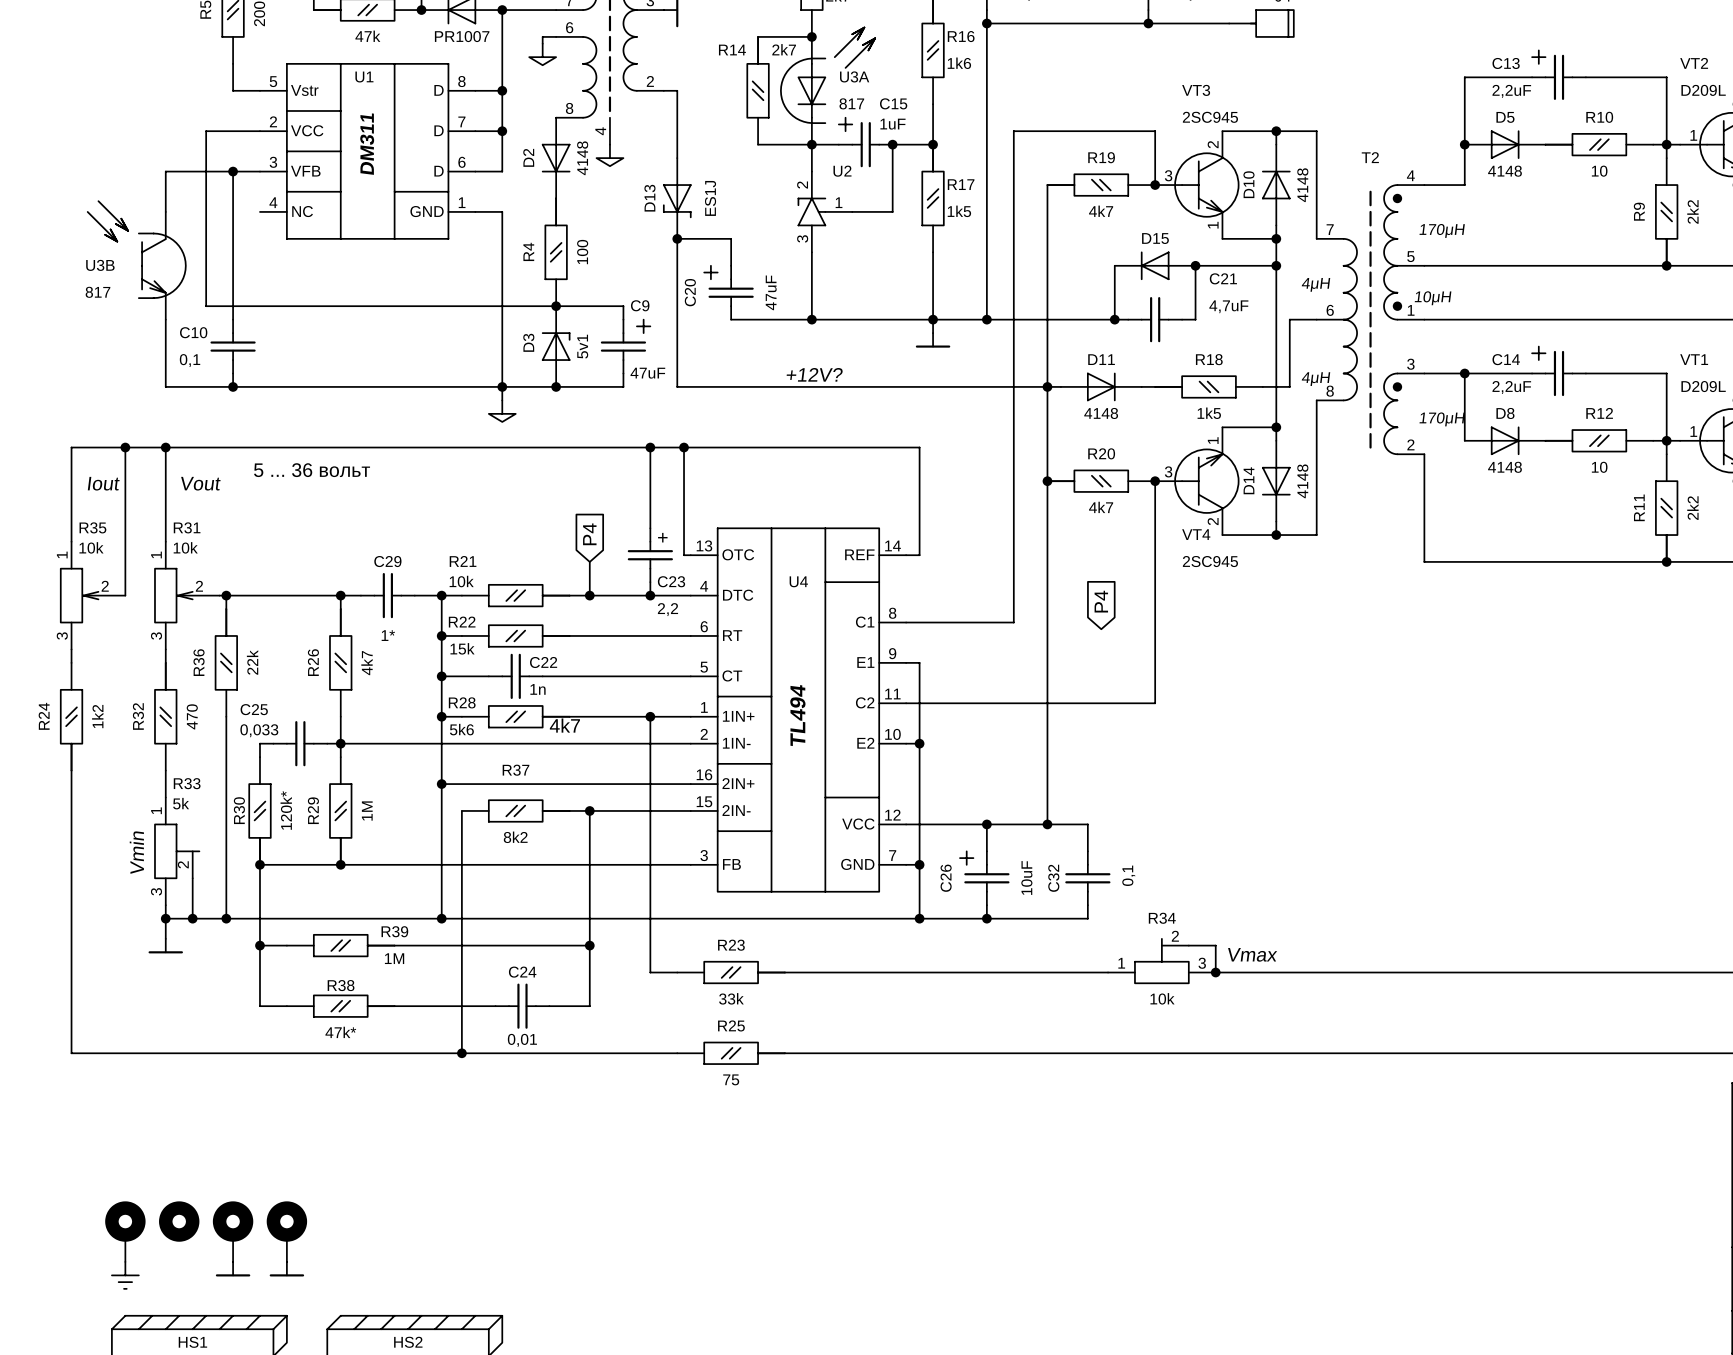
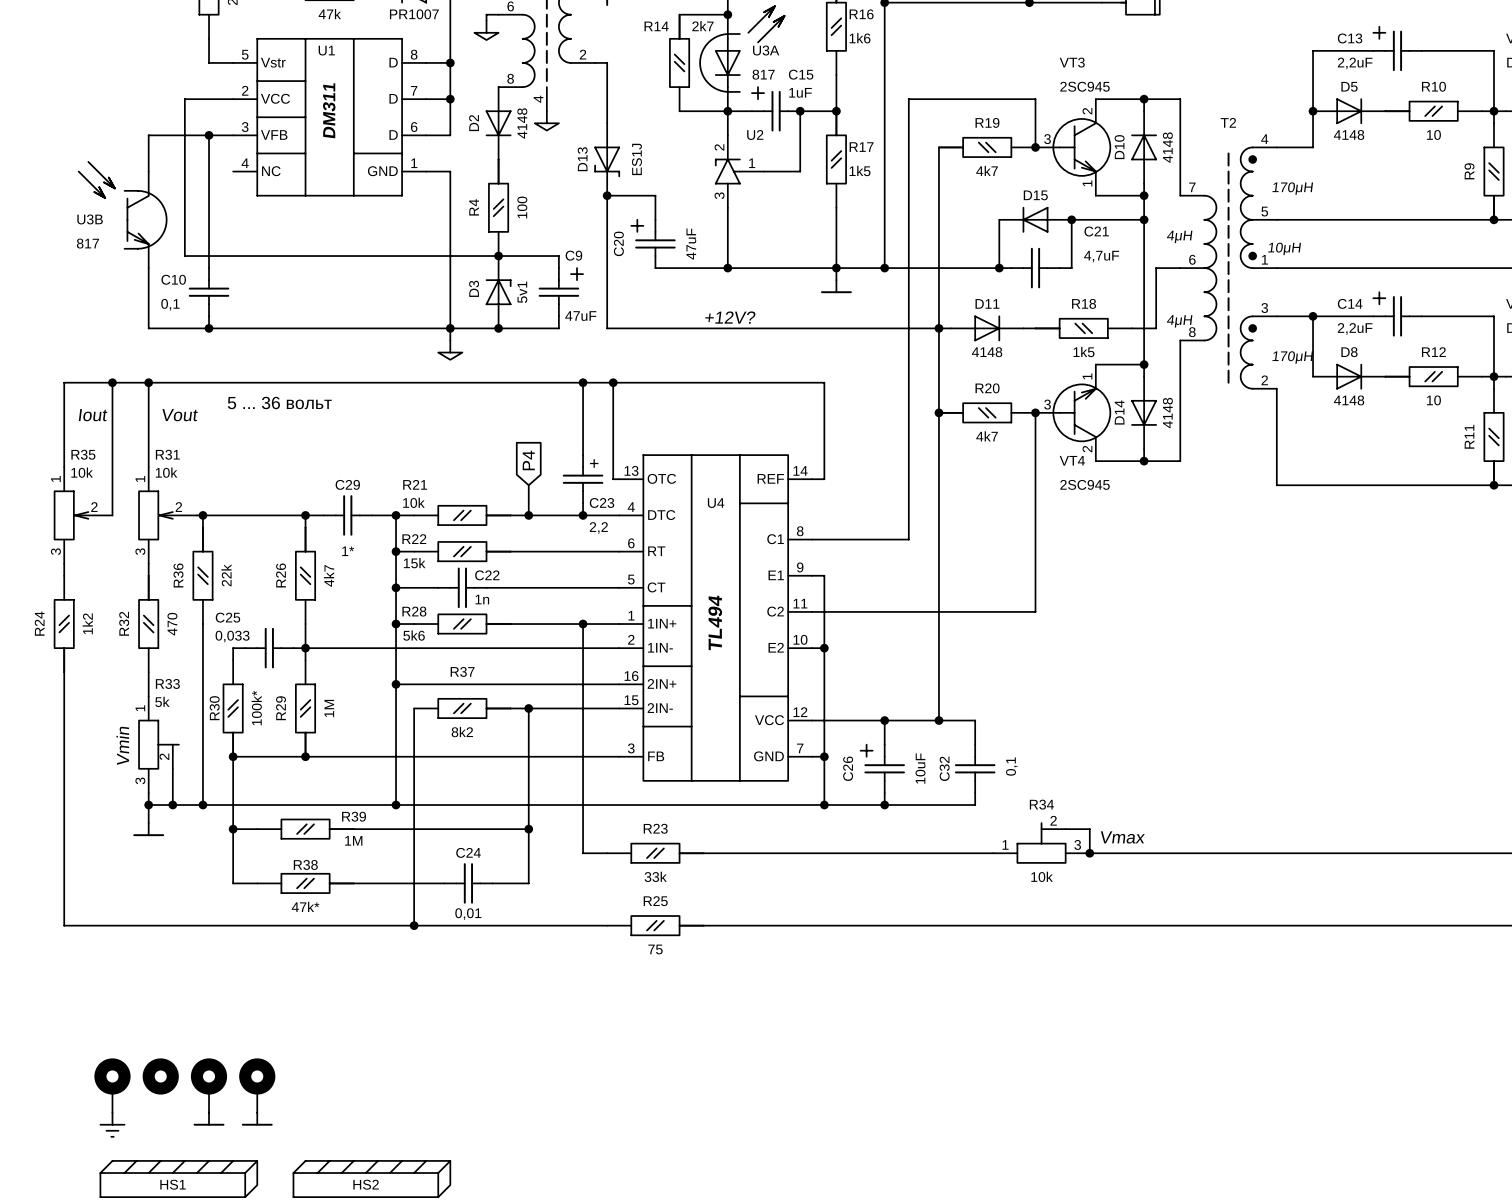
global label: P4 (1101, 601) -> none
text: 4k7 (564, 725) -> none
R30 value: 120k* (286, 810) -> 100k* (256, 708)

